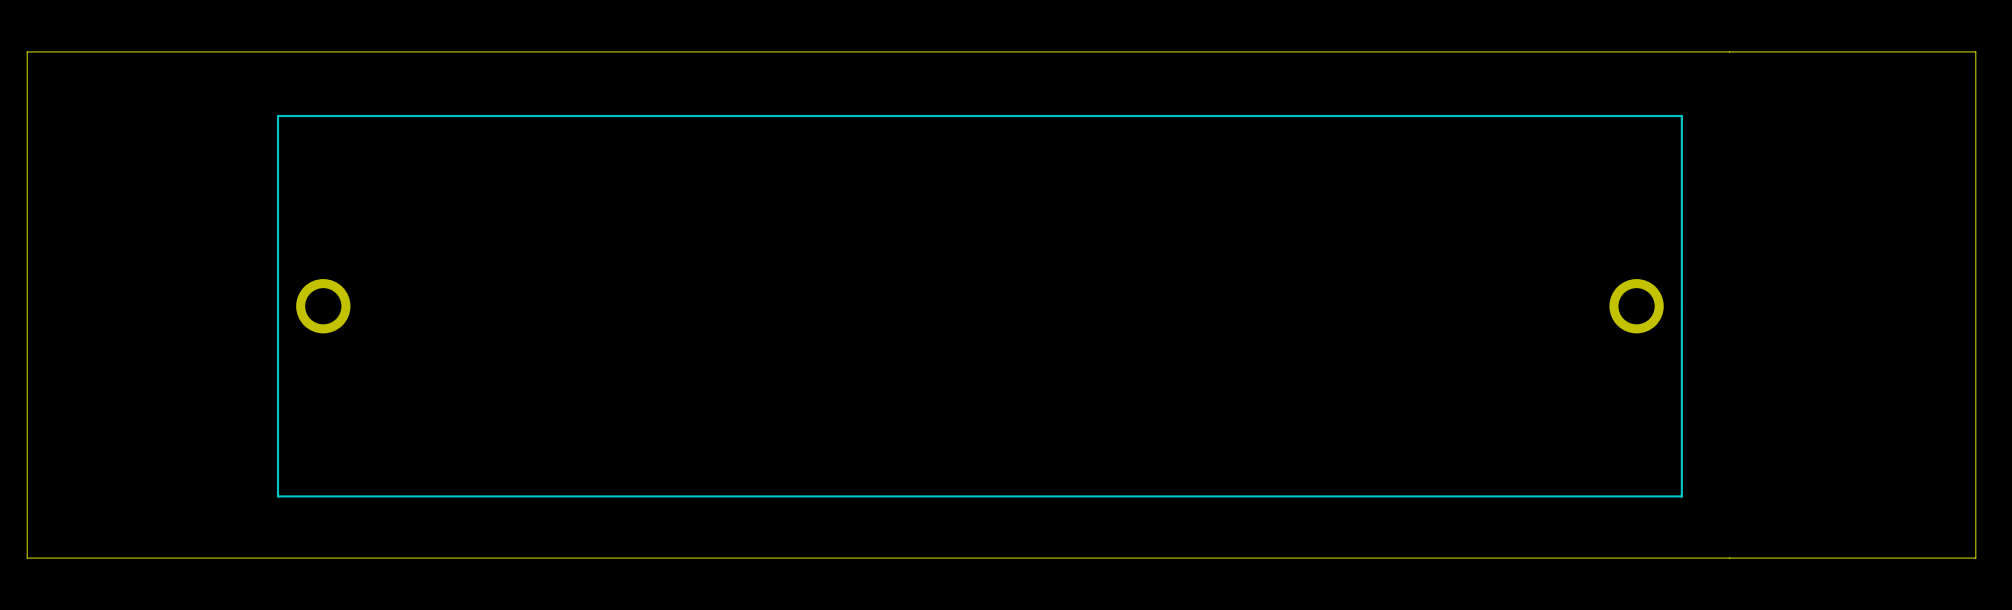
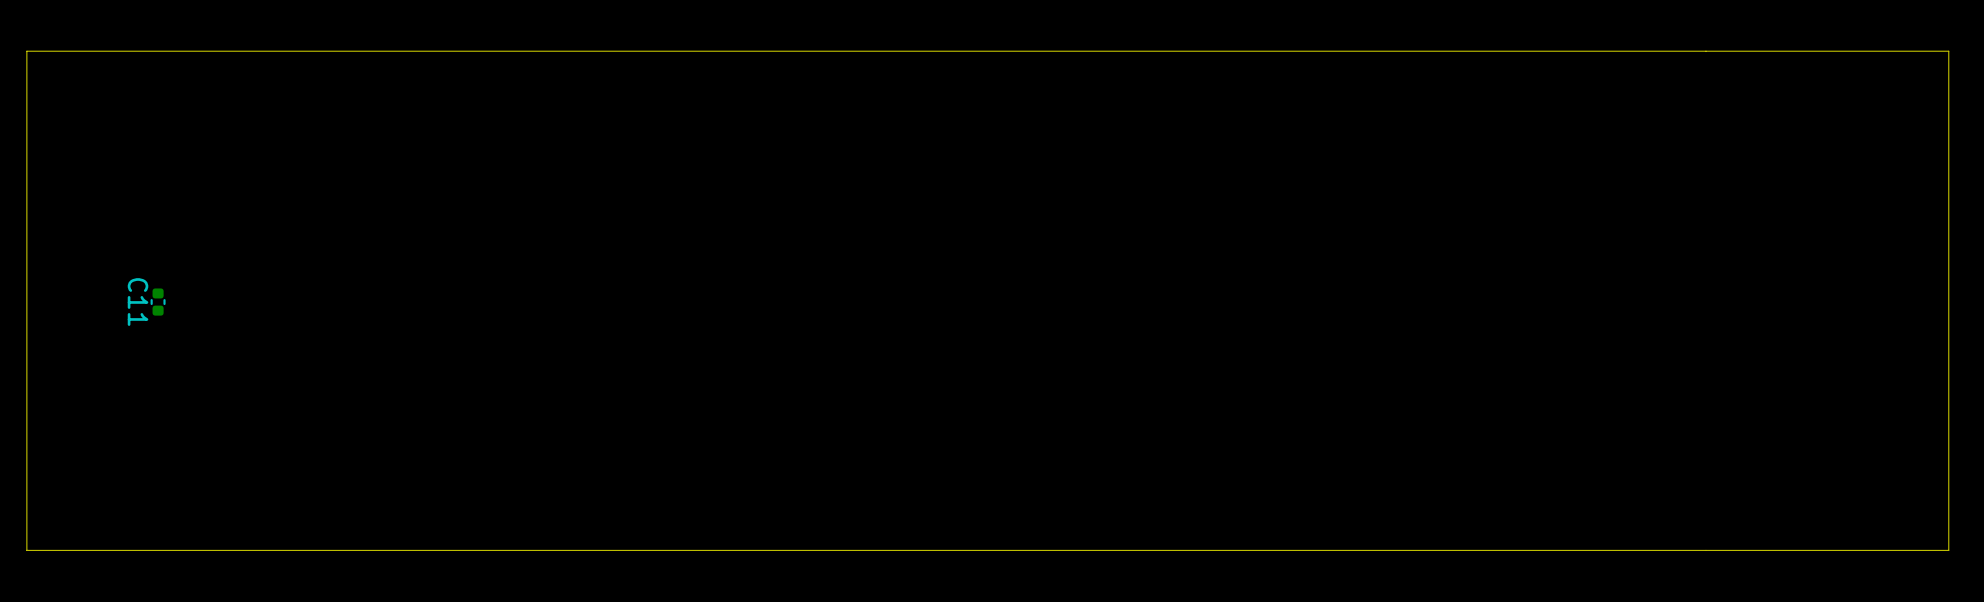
C11: none -> (158, 302)
part: (979, 306) -> none

